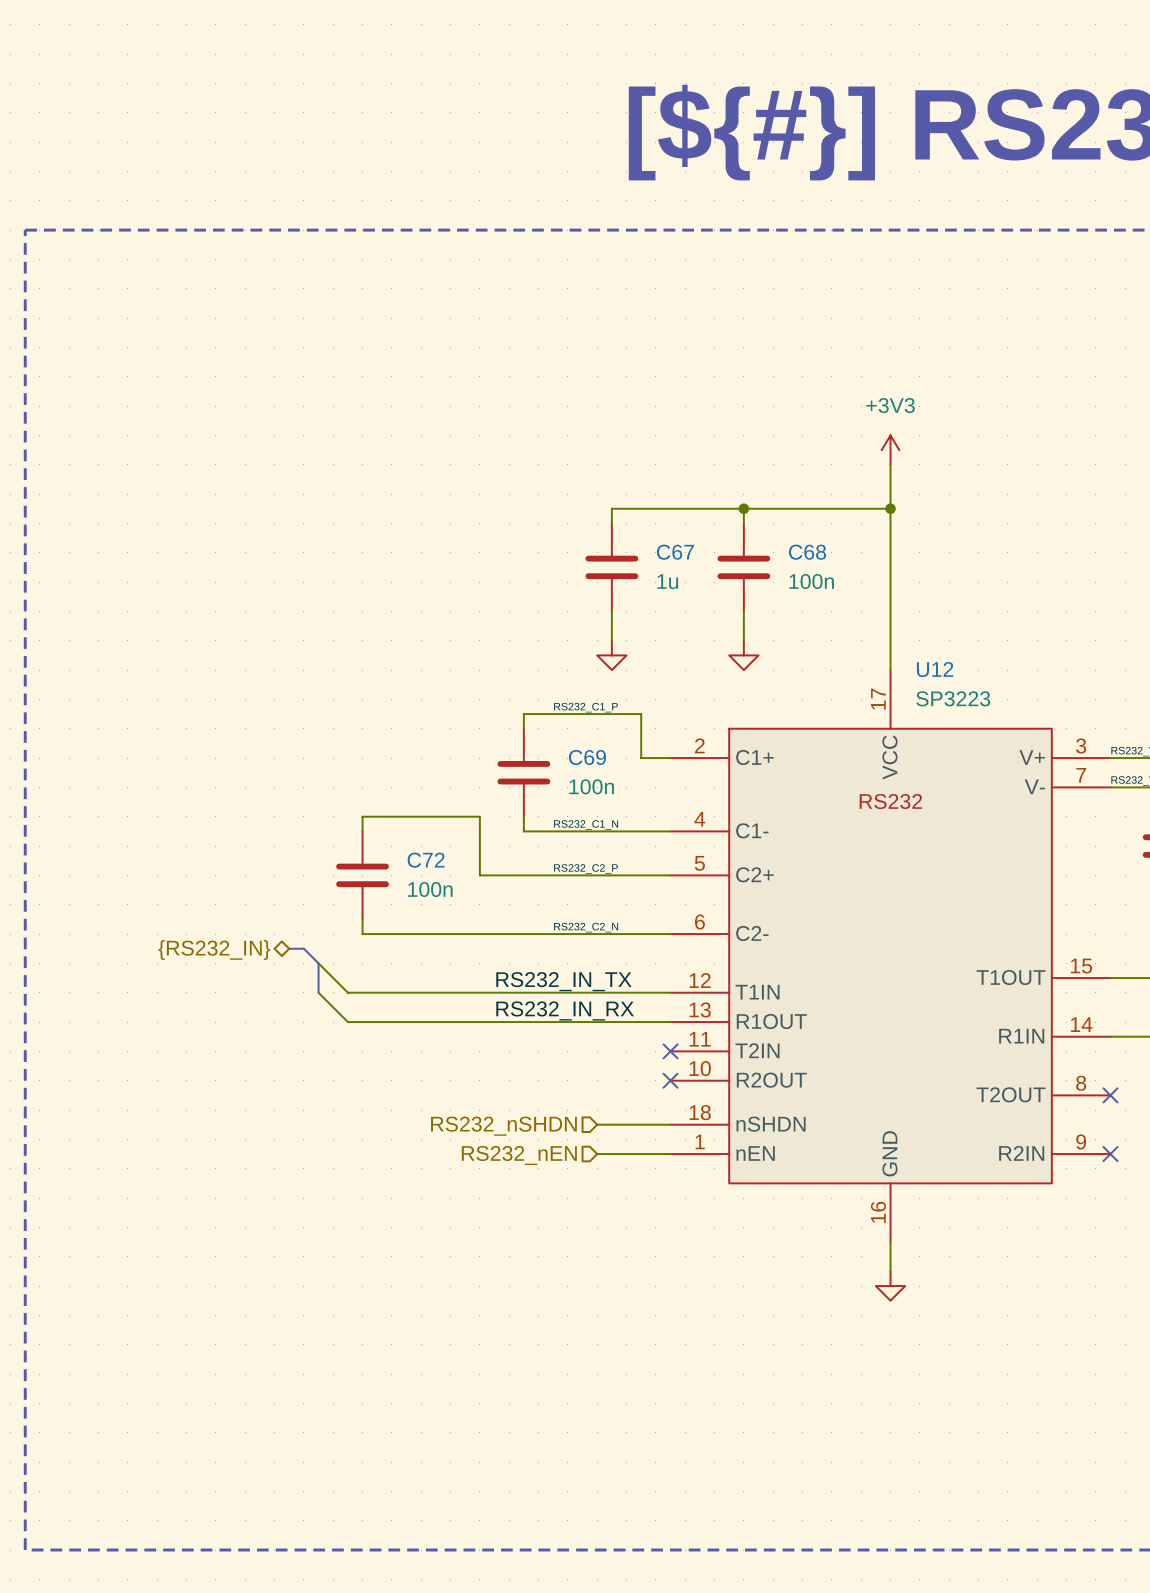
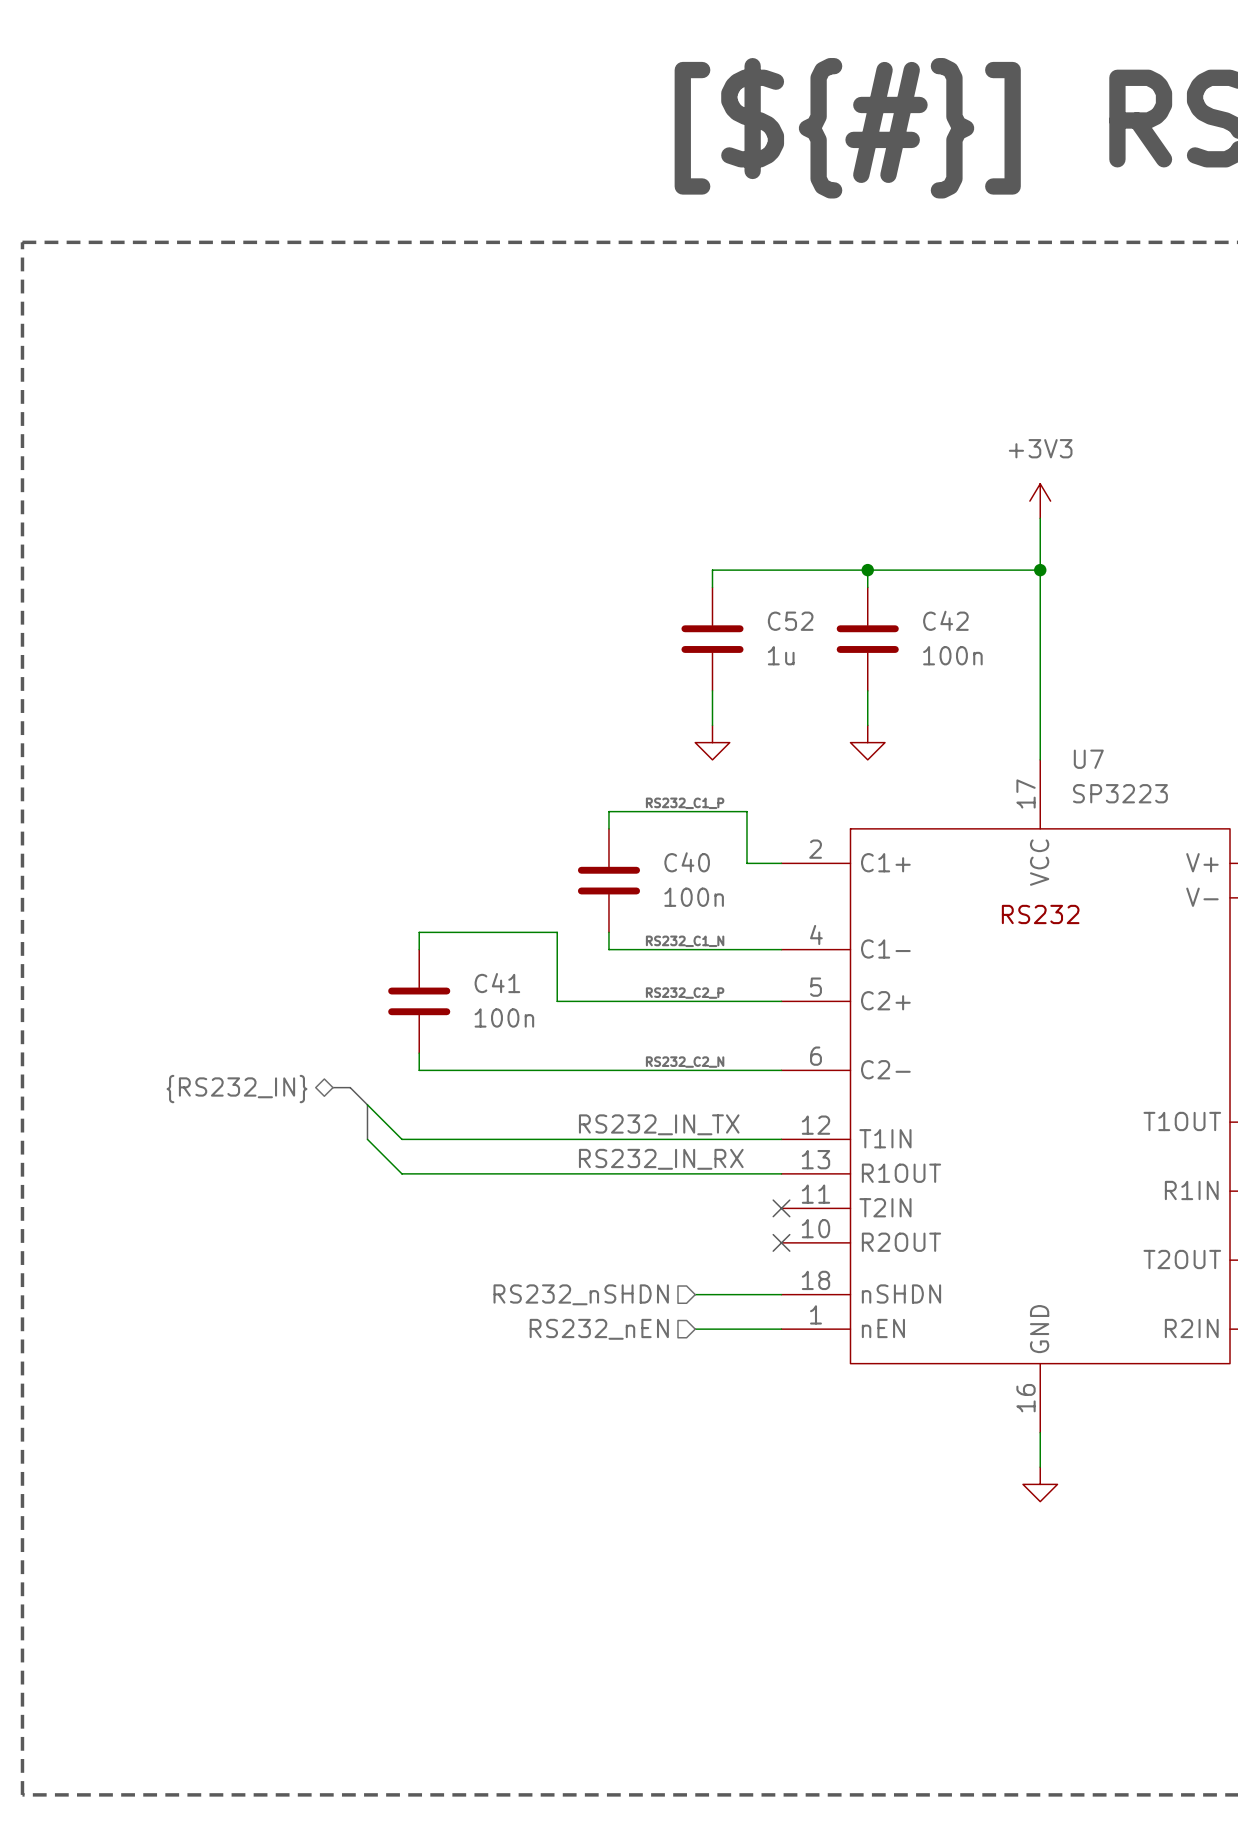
C67 name: C67 (675, 552) -> C52 (790, 621)
C68 name: C68 (807, 552) -> C42 (945, 620)
U12 name: U12 (935, 669) -> U7 (1088, 759)
C69 name: C69 (587, 757) -> C40 (687, 862)
C72 name: C72 (426, 860) -> C41 (497, 983)

